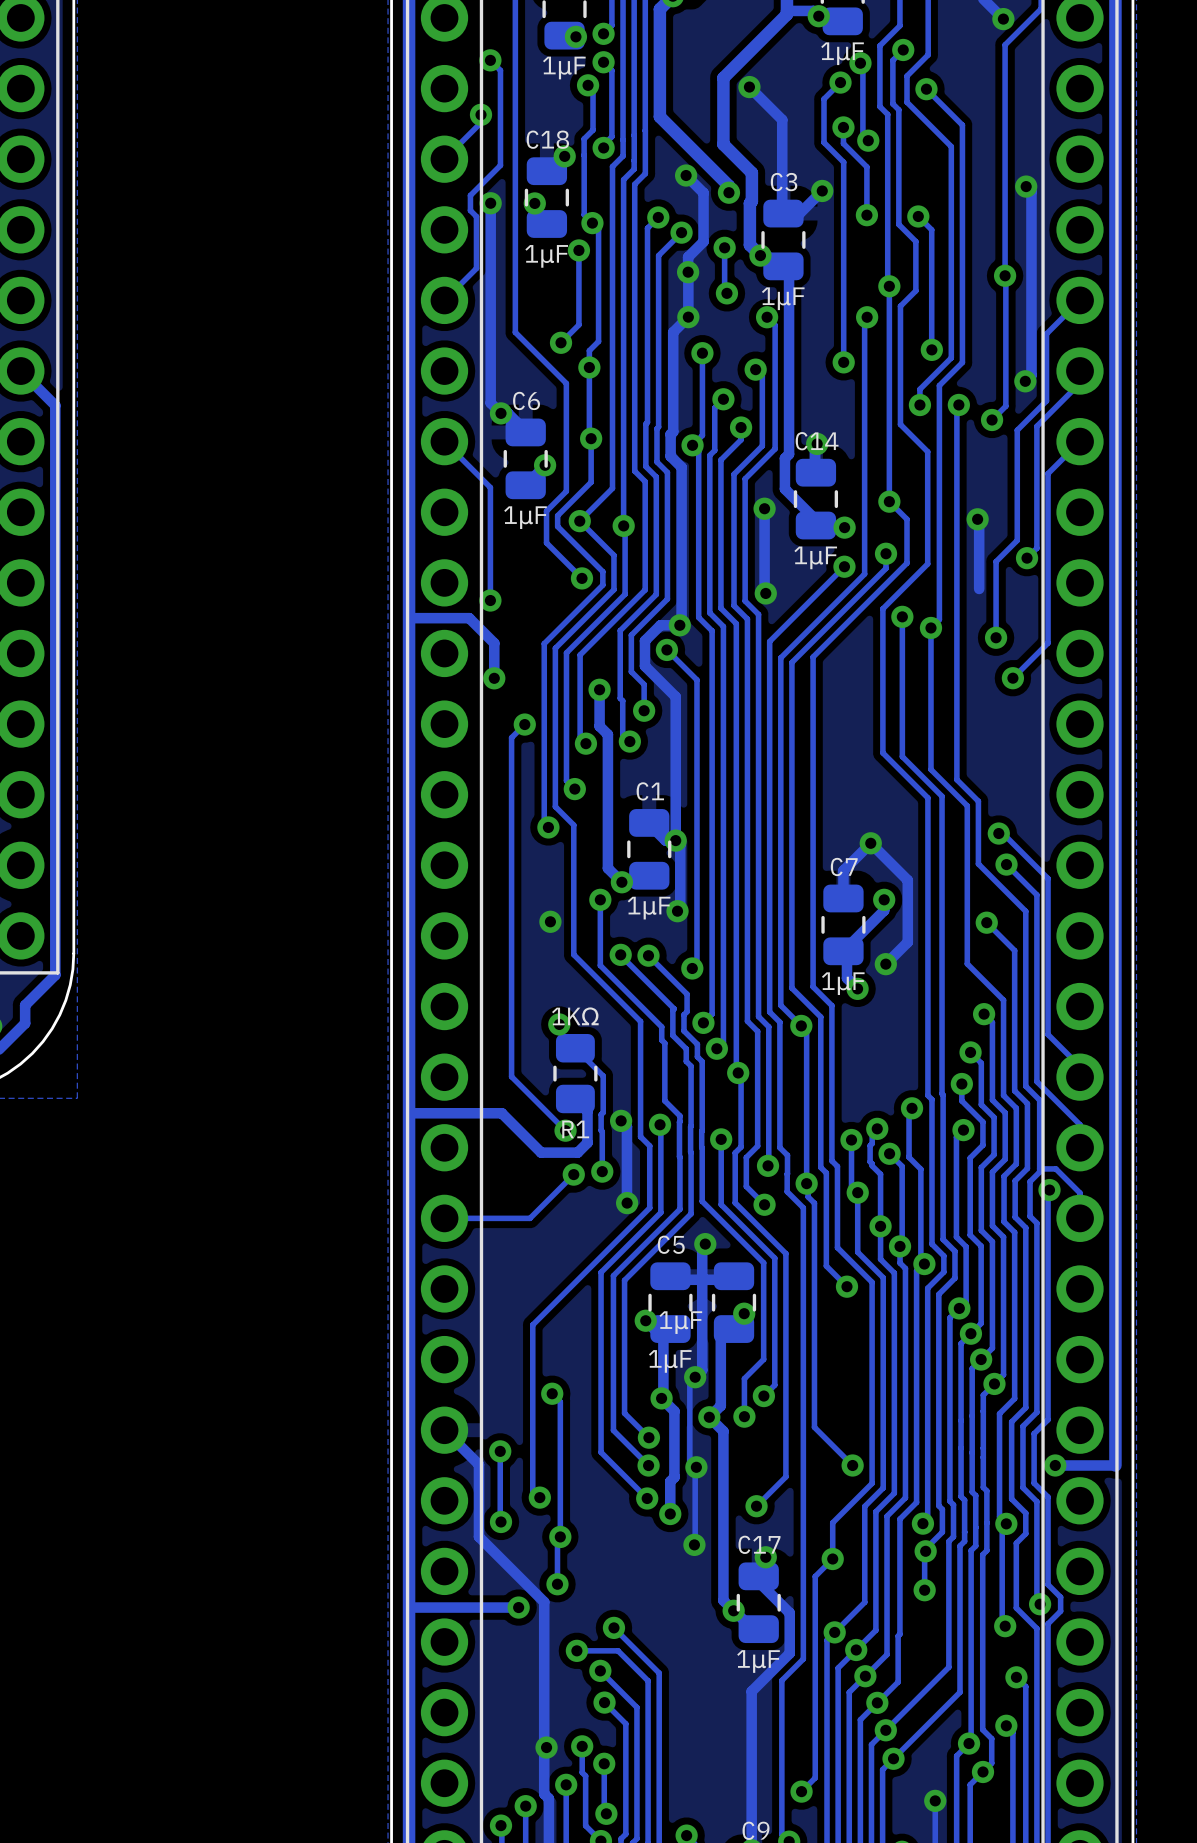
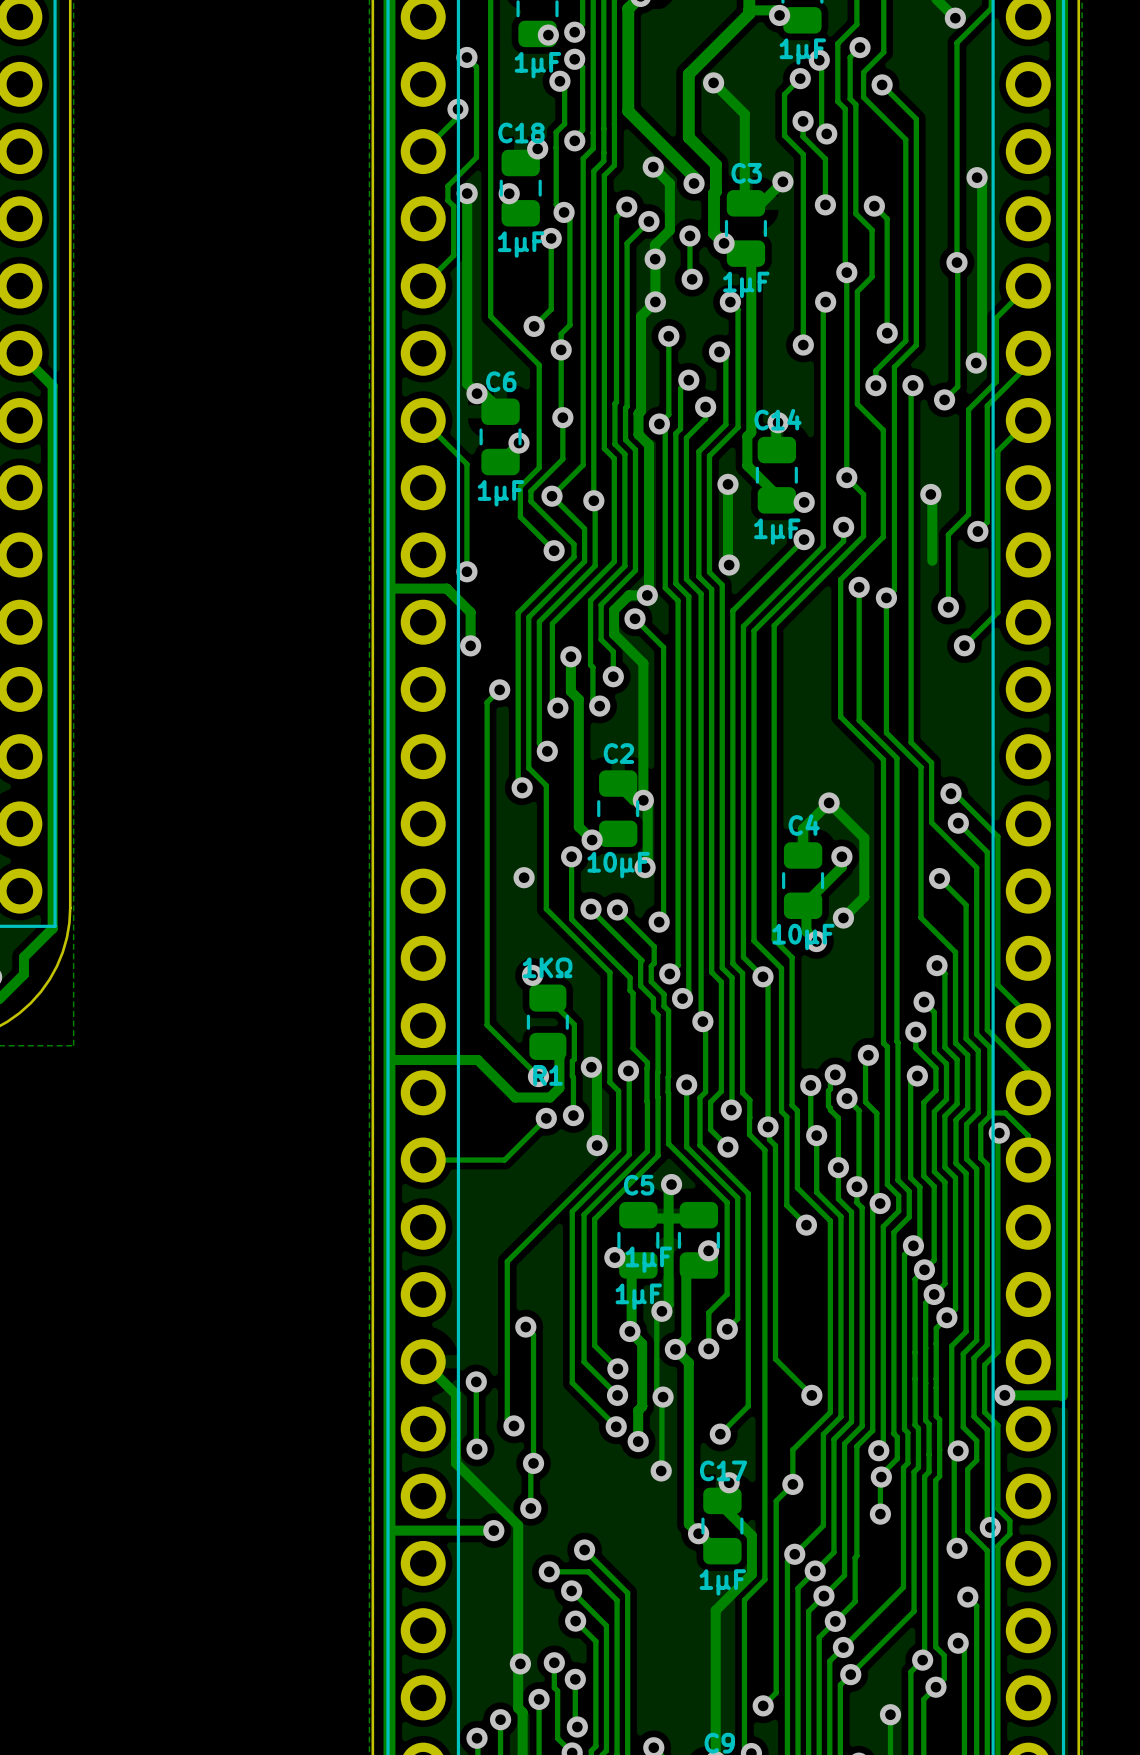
C1 name: C1 (650, 791) -> C2 (618, 753)
C7 name: C7 (844, 866) -> C4 (804, 825)
C1 value: 1μF (649, 908) -> 10μF (618, 865)
C7 value: 1μF (843, 983) -> 10μF (803, 937)

